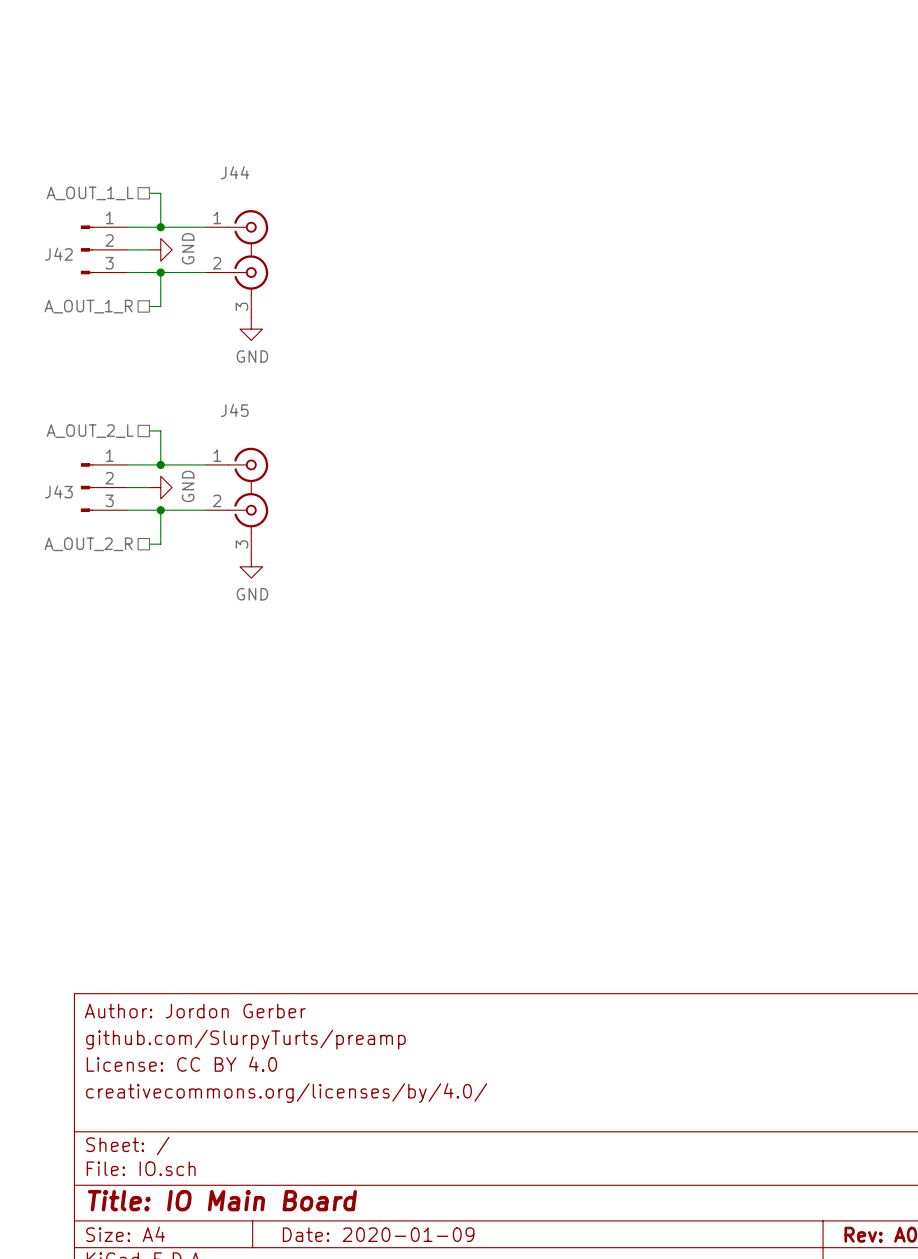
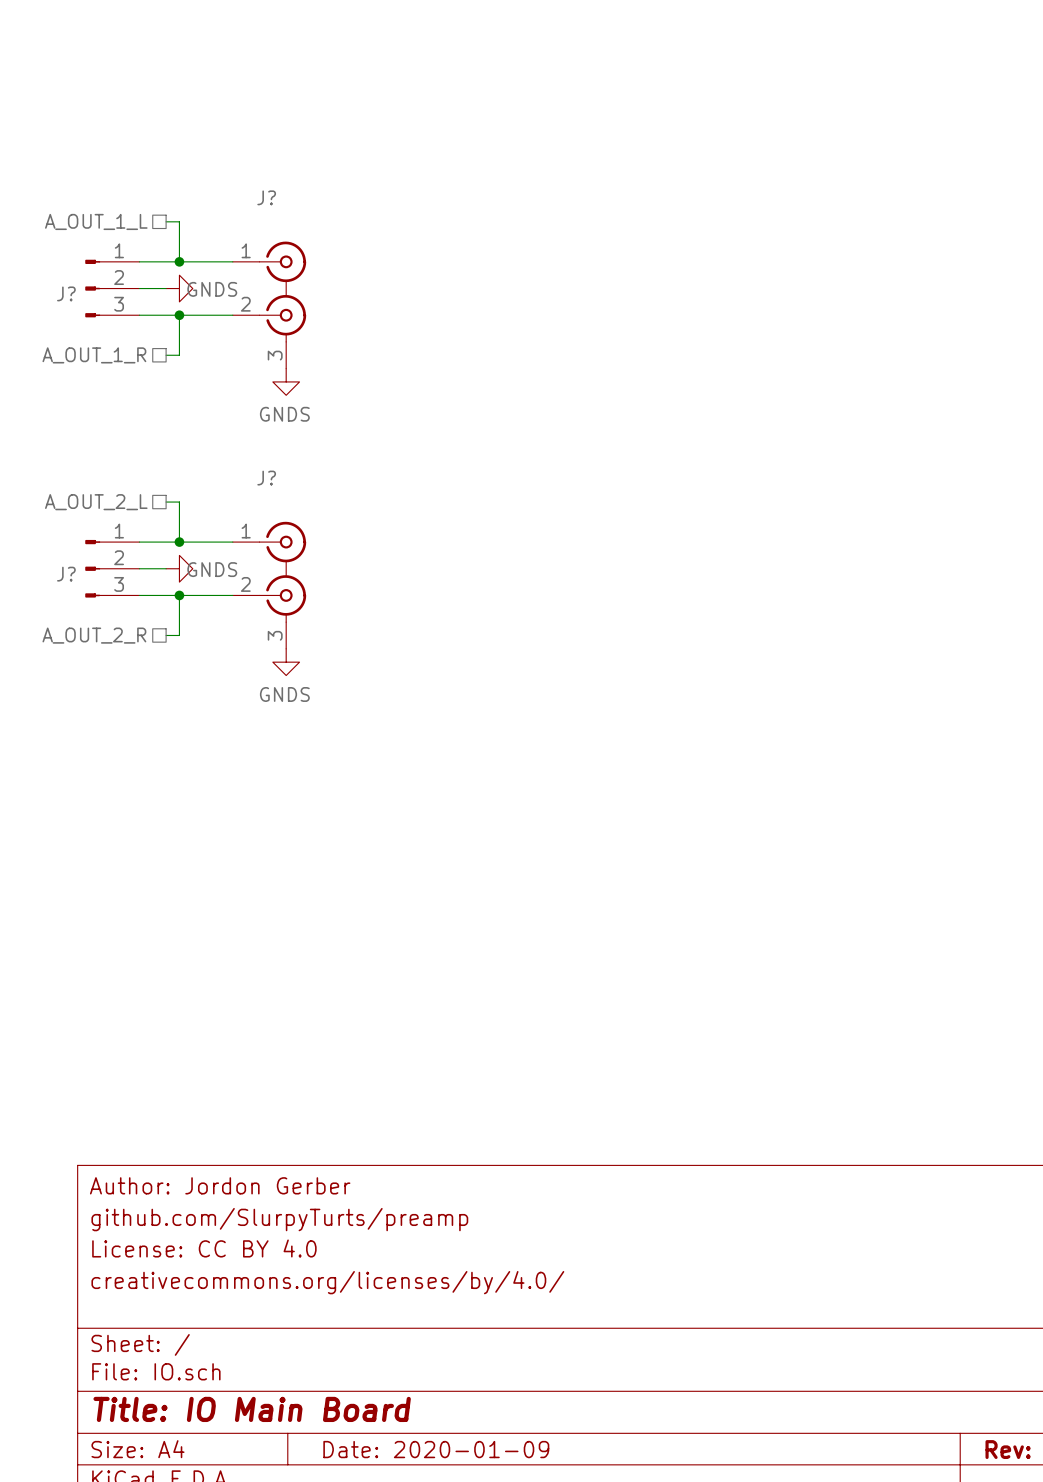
J44 name: J44 (235, 172) -> J? (266, 197)
power symbol: GND (160, 249) -> GNDS (179, 288)
J42 name: J42 (58, 254) -> J? (66, 293)
power symbol: GND (251, 329) -> GNDS (286, 381)
J45 name: J45 (234, 410) -> J? (266, 478)
power symbol: GND (160, 487) -> GNDS (179, 568)
J43 name: J43 (58, 491) -> J? (66, 574)
power symbol: GND (251, 566) -> GNDS (286, 662)

